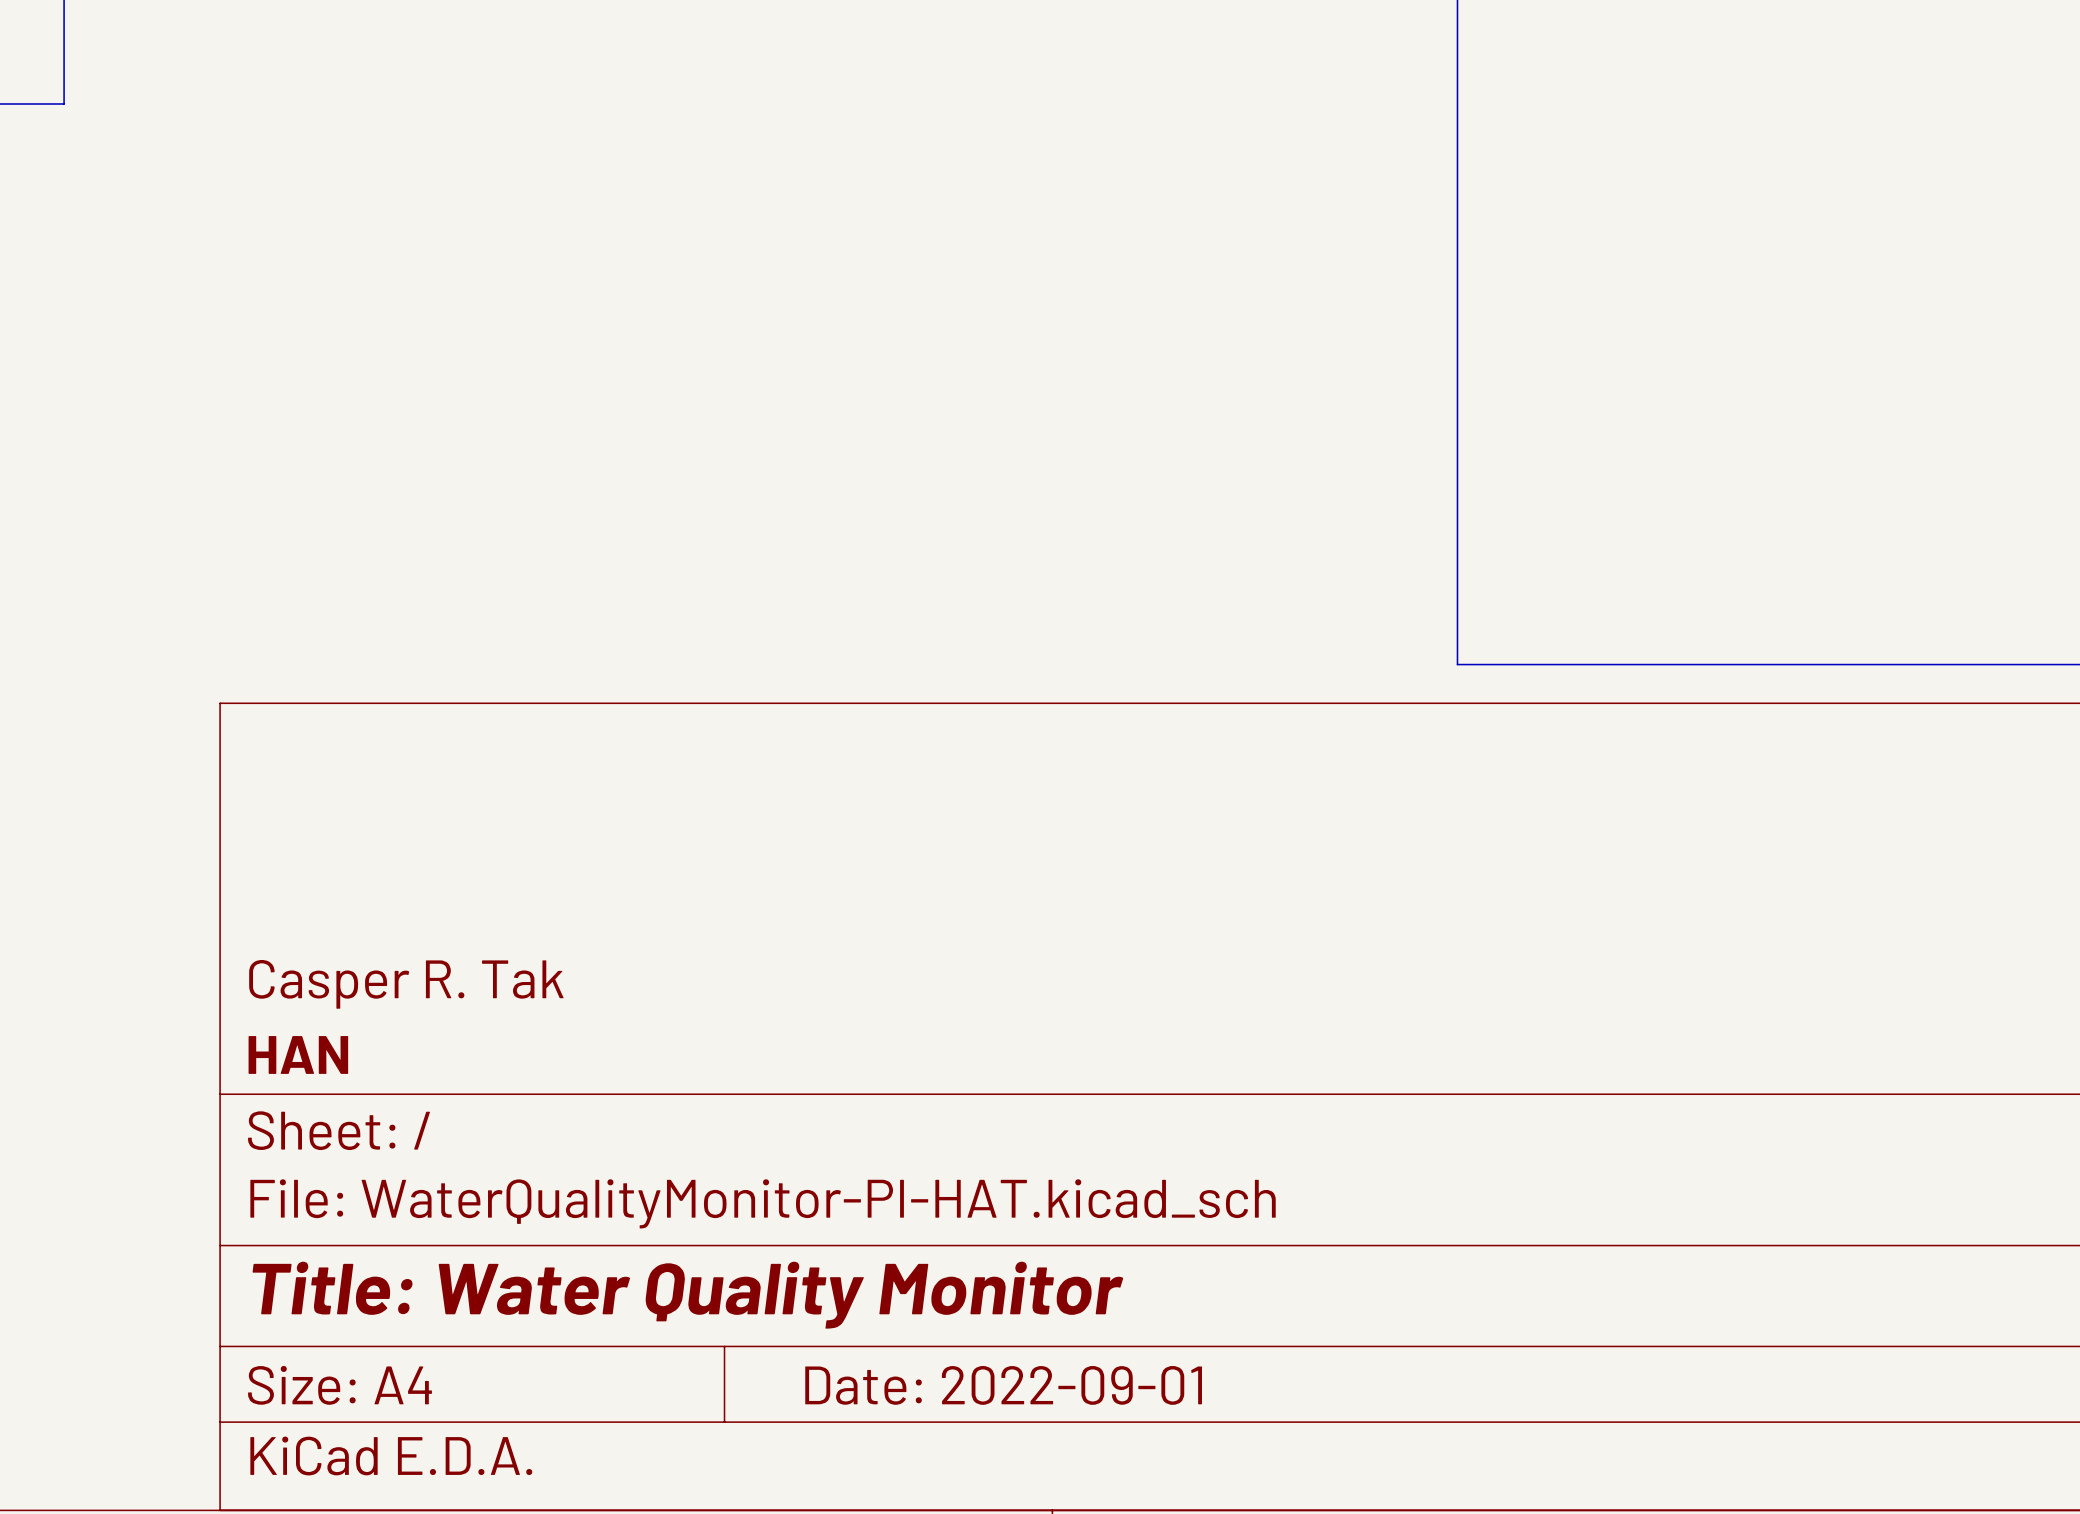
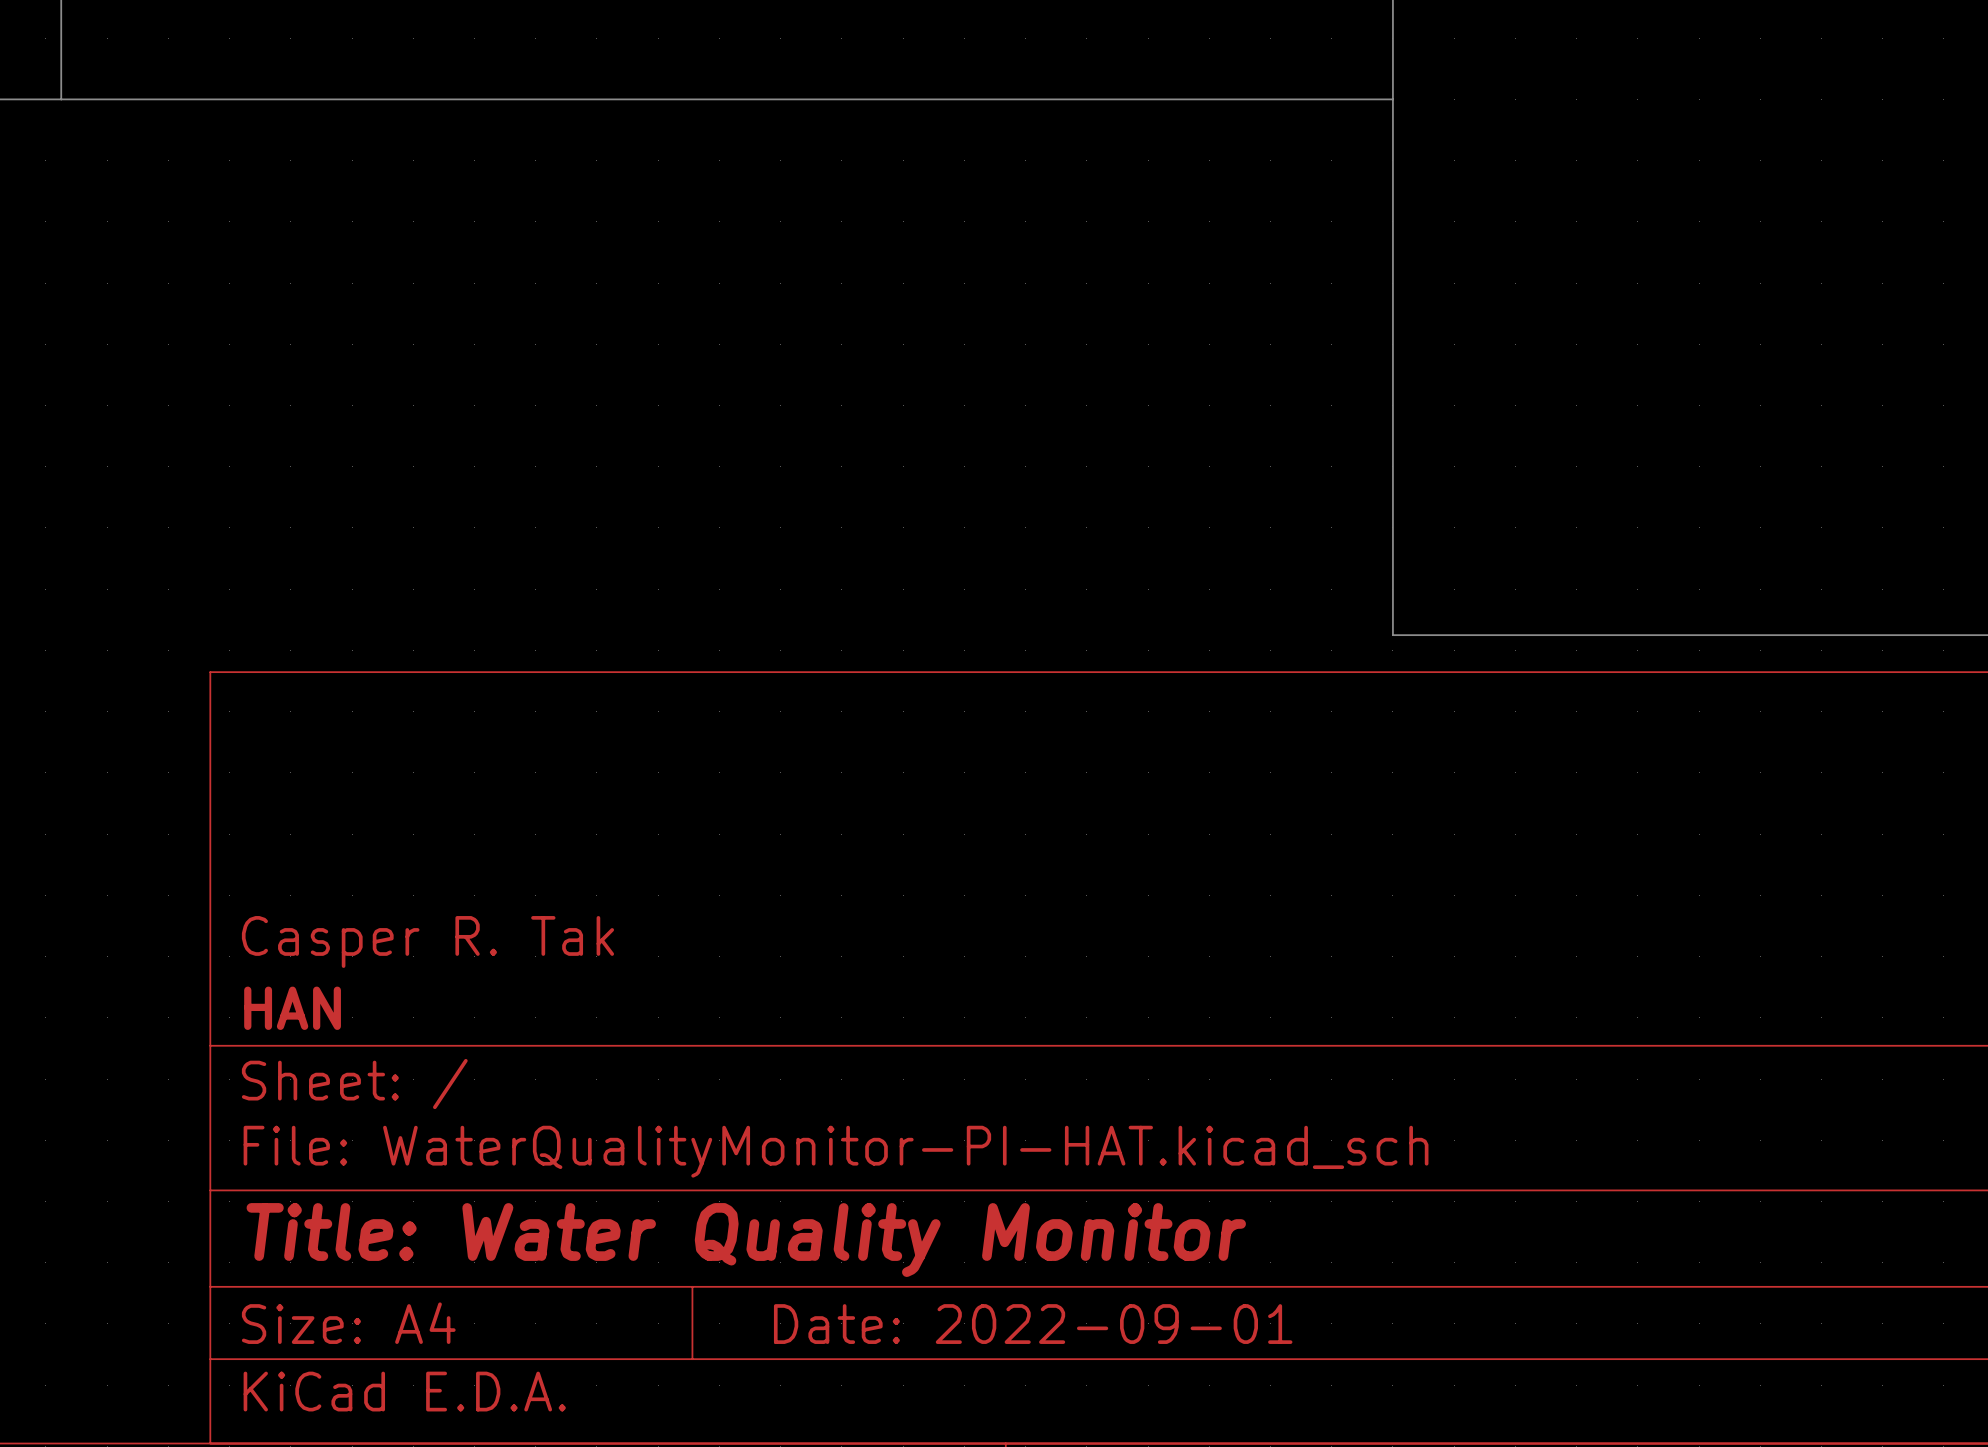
line: none -> (61, 99) (1392, 99)

